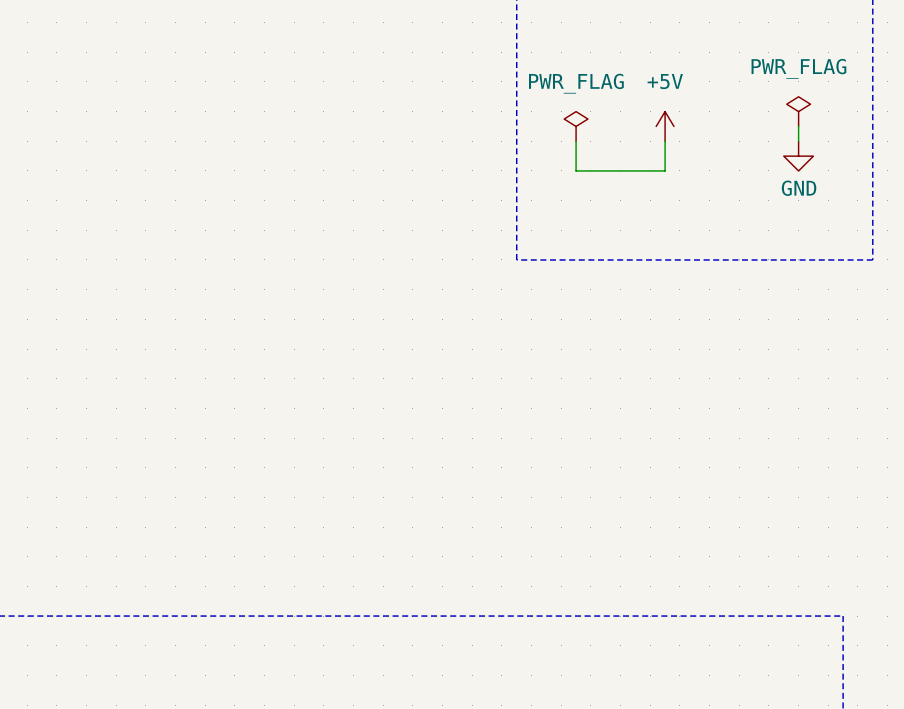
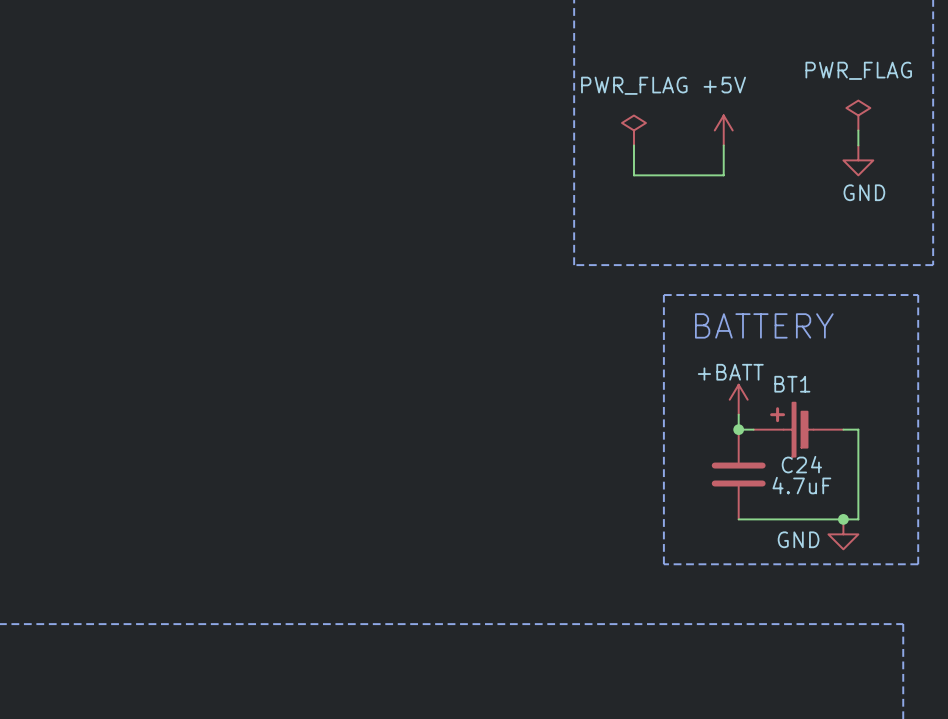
line: none -> (663, 295) (918, 295) (918, 564) (663, 564) (663, 295)
text: none -> BATTERY (764, 325)
power symbol: none -> +BATT (738, 399)
wire: none -> (738, 414) (738, 429) (753, 429)
junction: none -> (738, 429)
BT1: none -> (798, 429)
wire: none -> (843, 429) (858, 429) (858, 519) (738, 519)
C24: none -> 4.7uF (738, 474)
junction: none -> (843, 519)
power symbol: none -> GND (843, 534)

